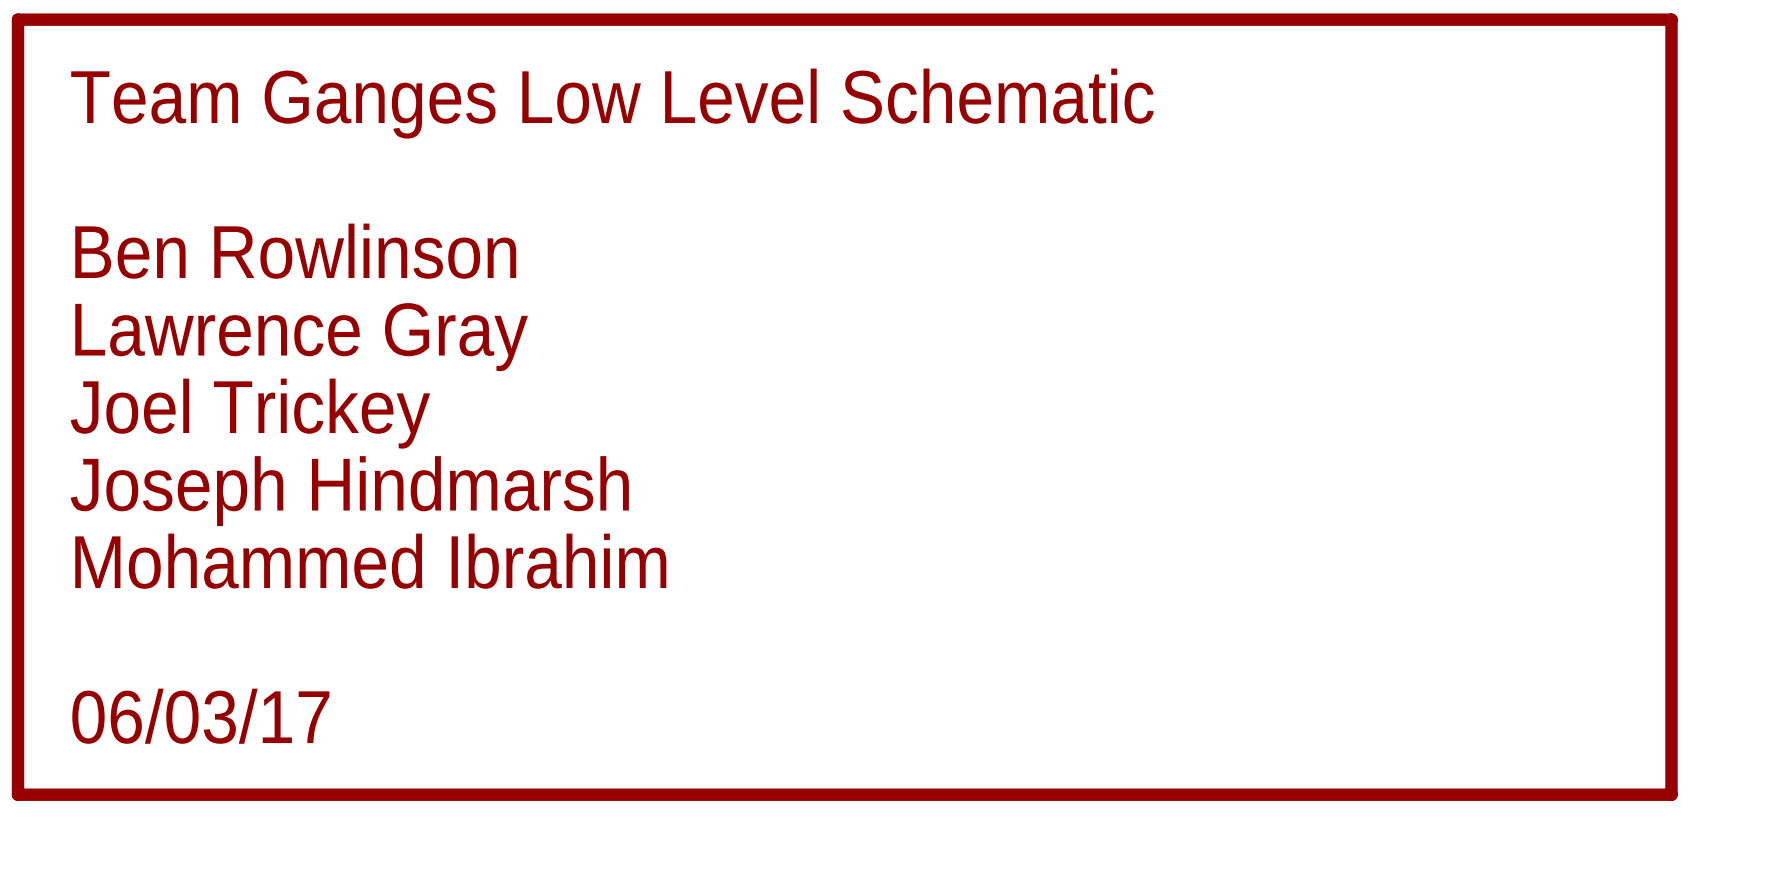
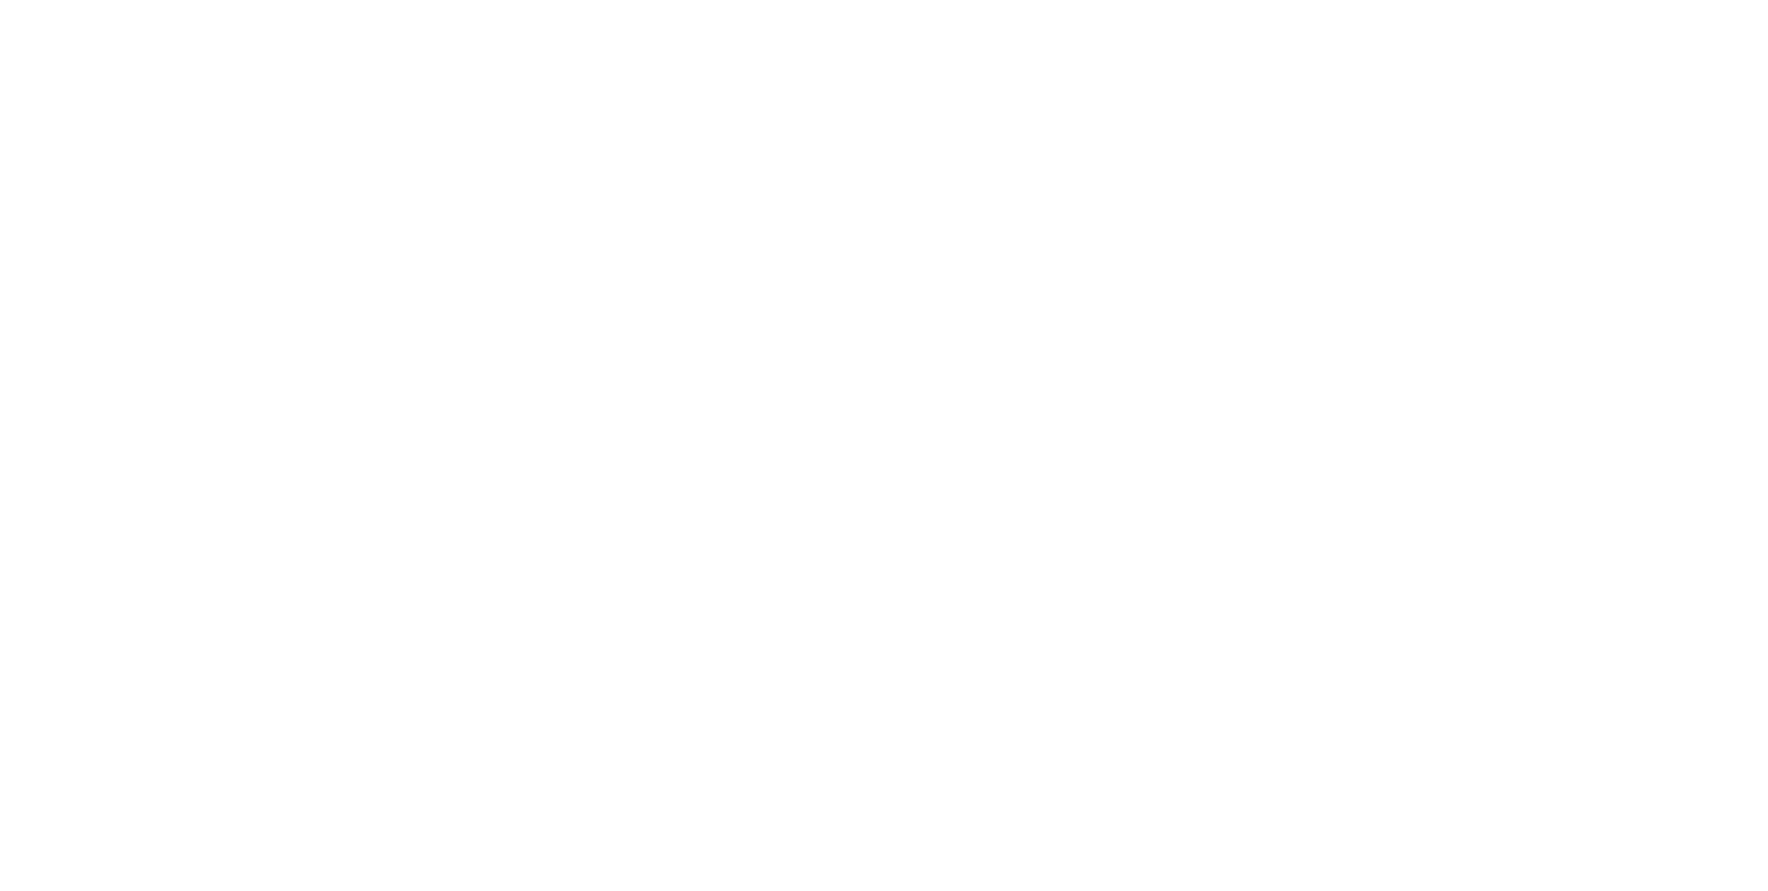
line: (18, 19) (18, 794) (1671, 794) (1671, 19) (18, 19) -> none
text: Team Ganges Low Level Schematic (612, 103) -> none
text: Ben Rowlinson (295, 251) -> none
text: Lawrence Gray (301, 337) -> none
text: Joel Trickey (250, 413) -> none
text: Joseph Hindmarsh (349, 491) -> none
text: Mohammed Ibrahim (370, 561) -> none
text: 06/03/17 (200, 716) -> none

